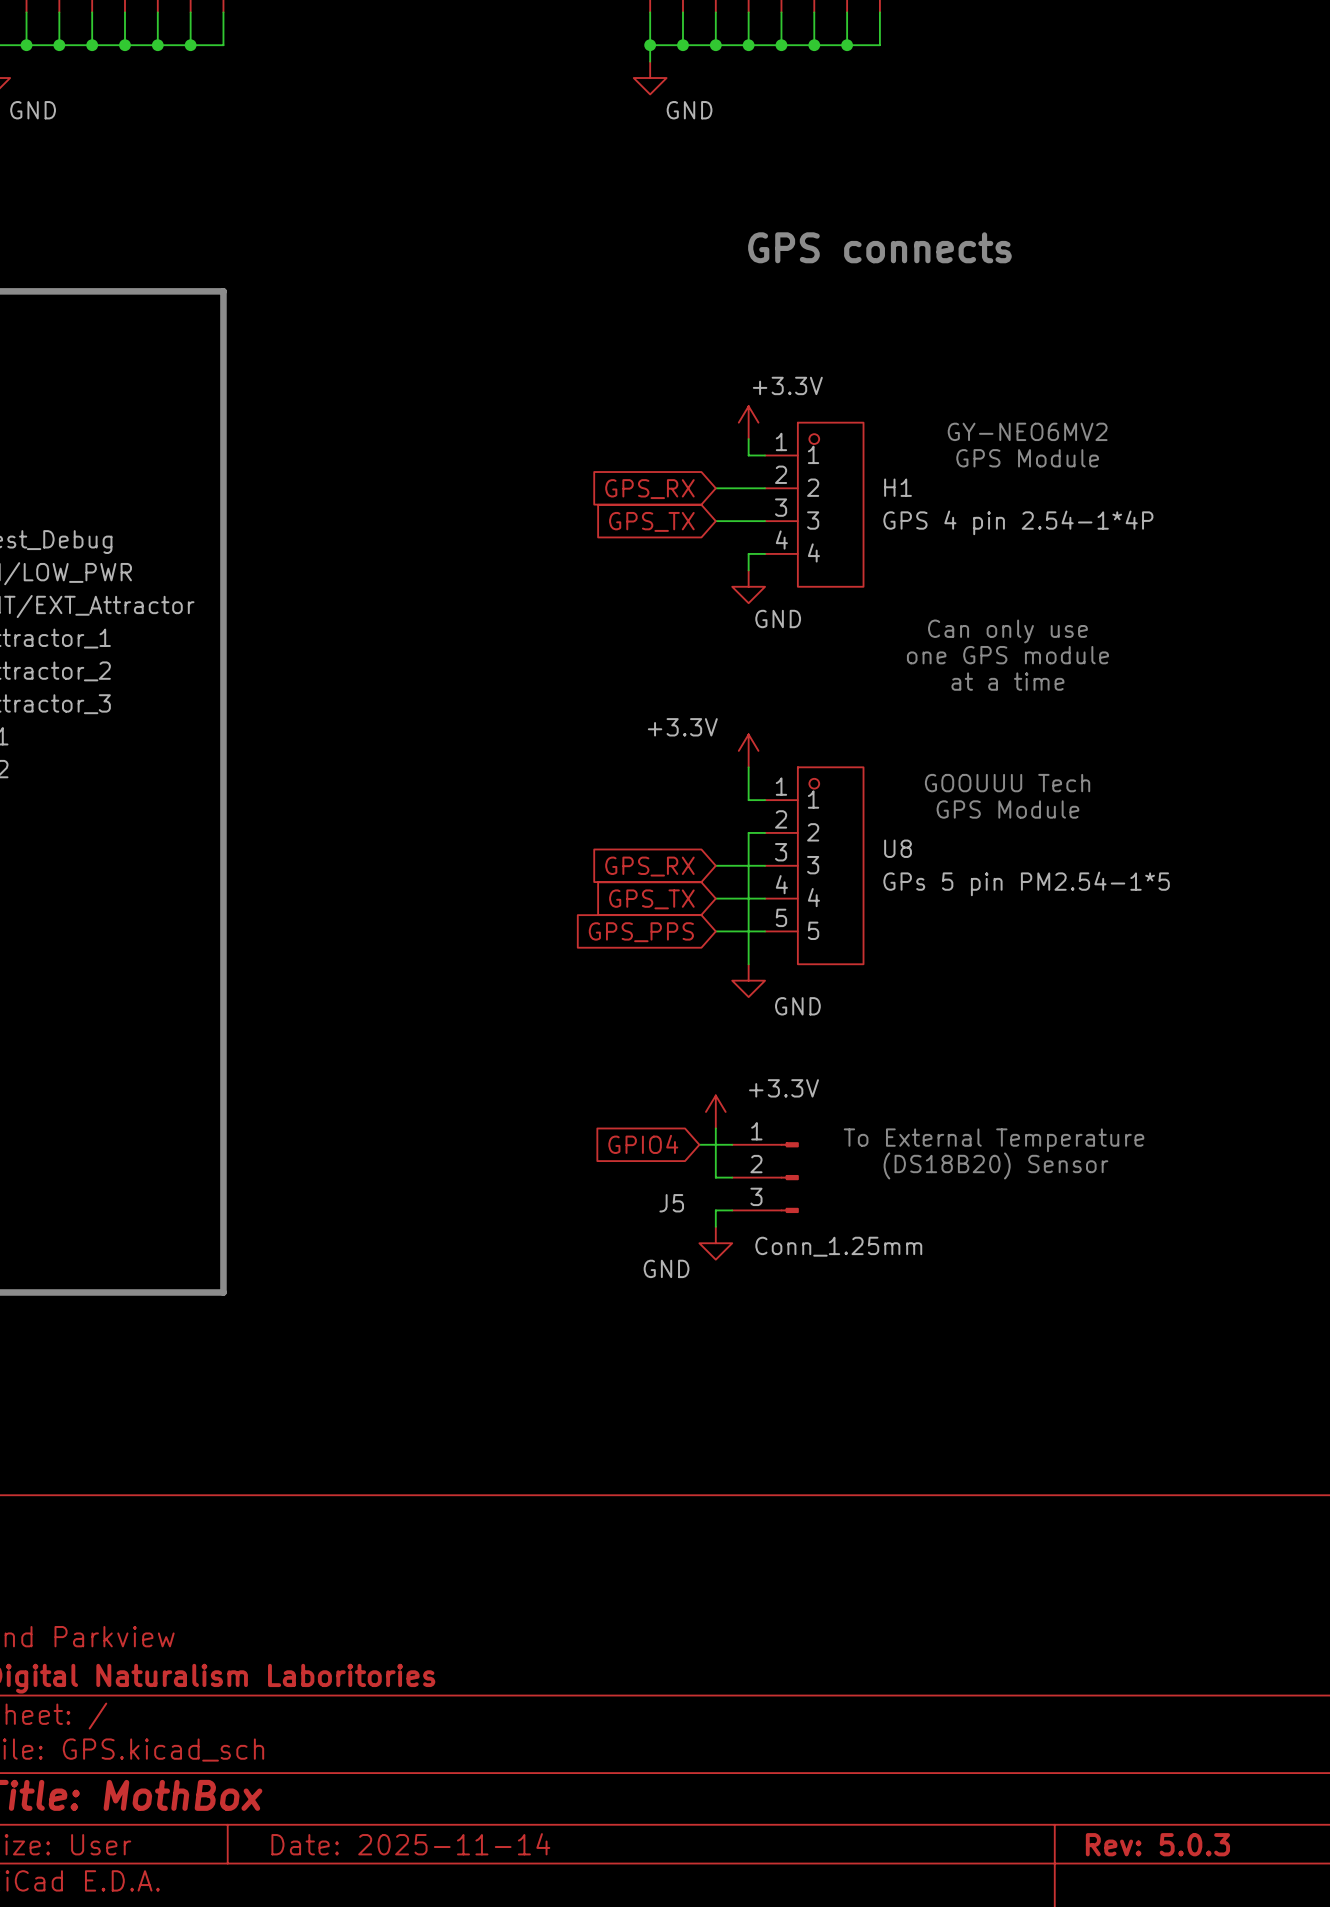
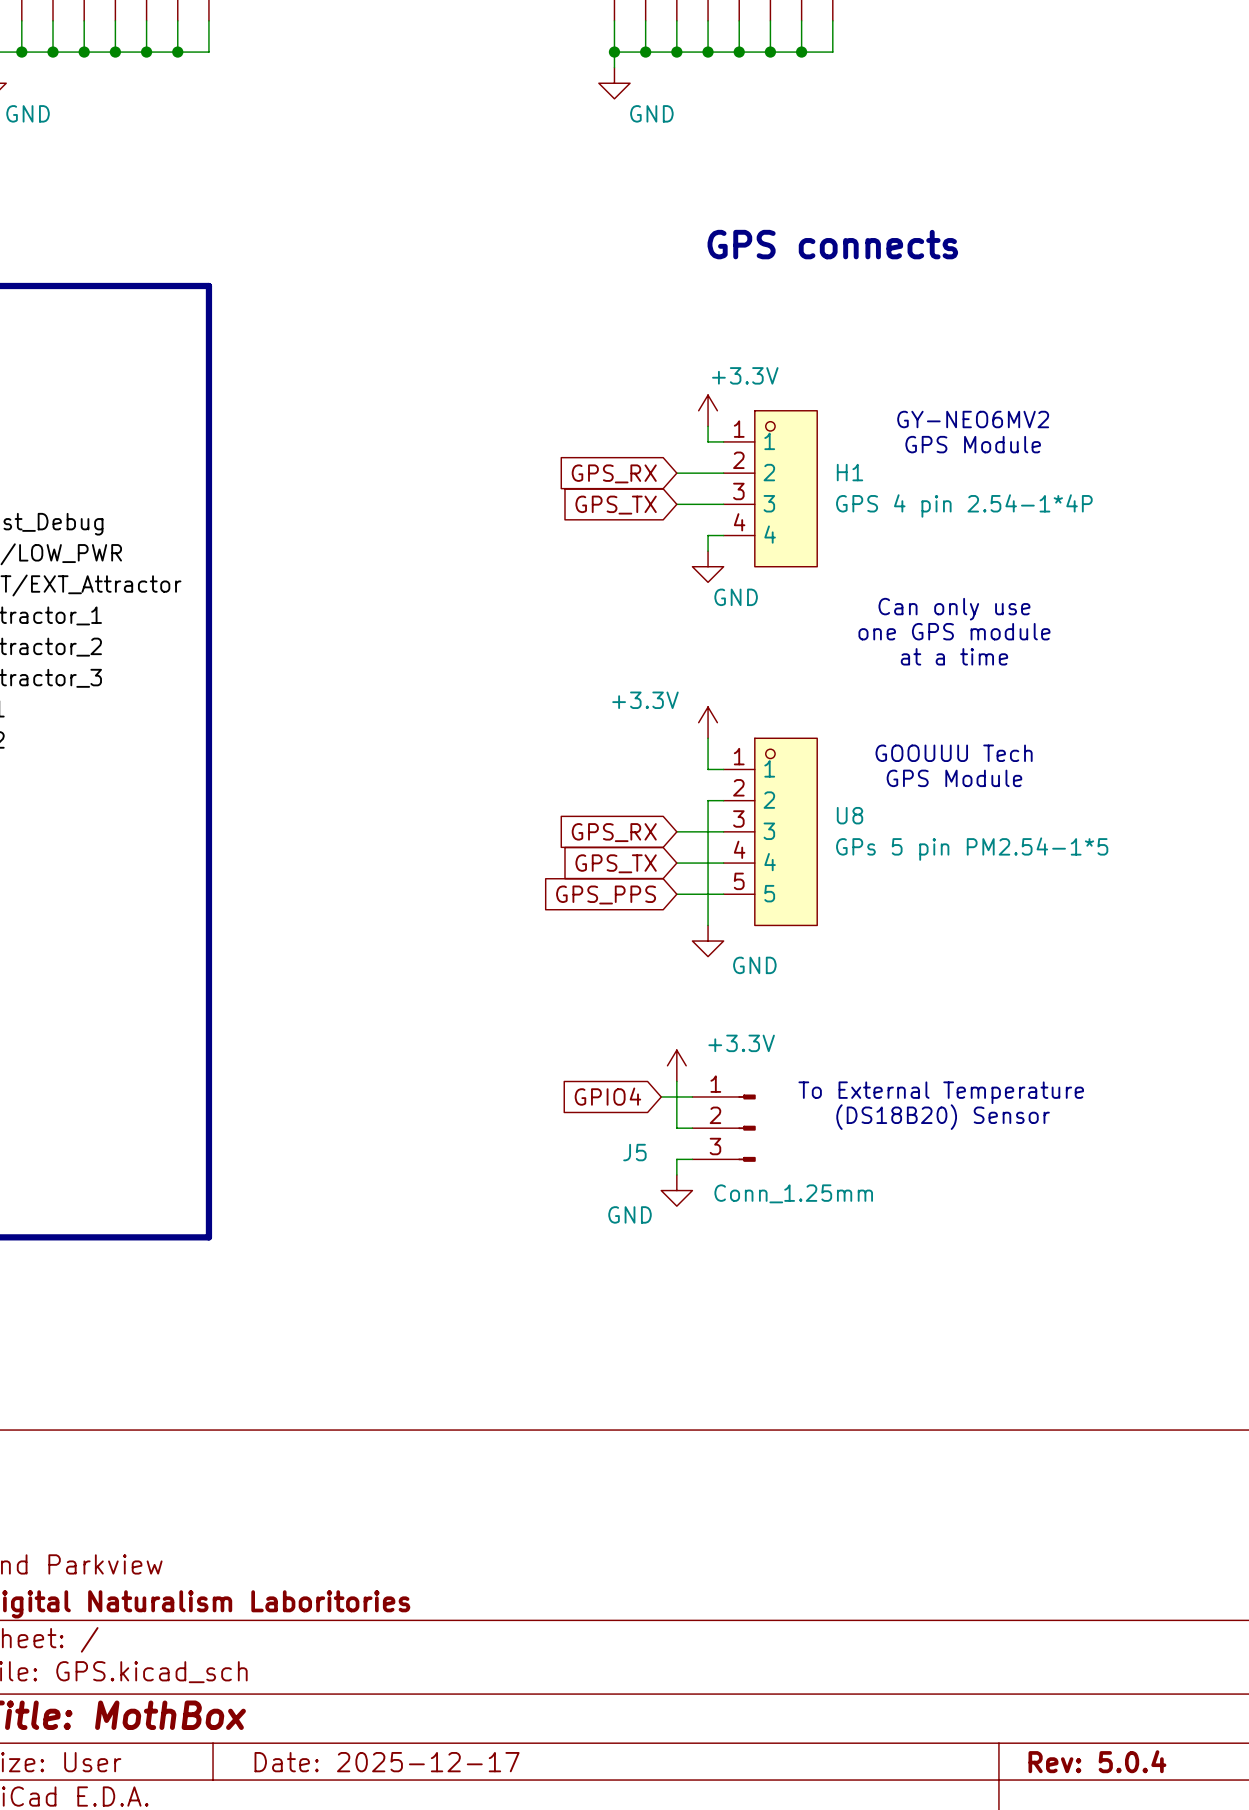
title block: Date: 2025-11-14 (410, 1844) -> Date: 2025-12-17 (387, 1762)
title block: Rev: 5.0.3 (1157, 1844) -> Rev: 5.0.4 (1097, 1761)

